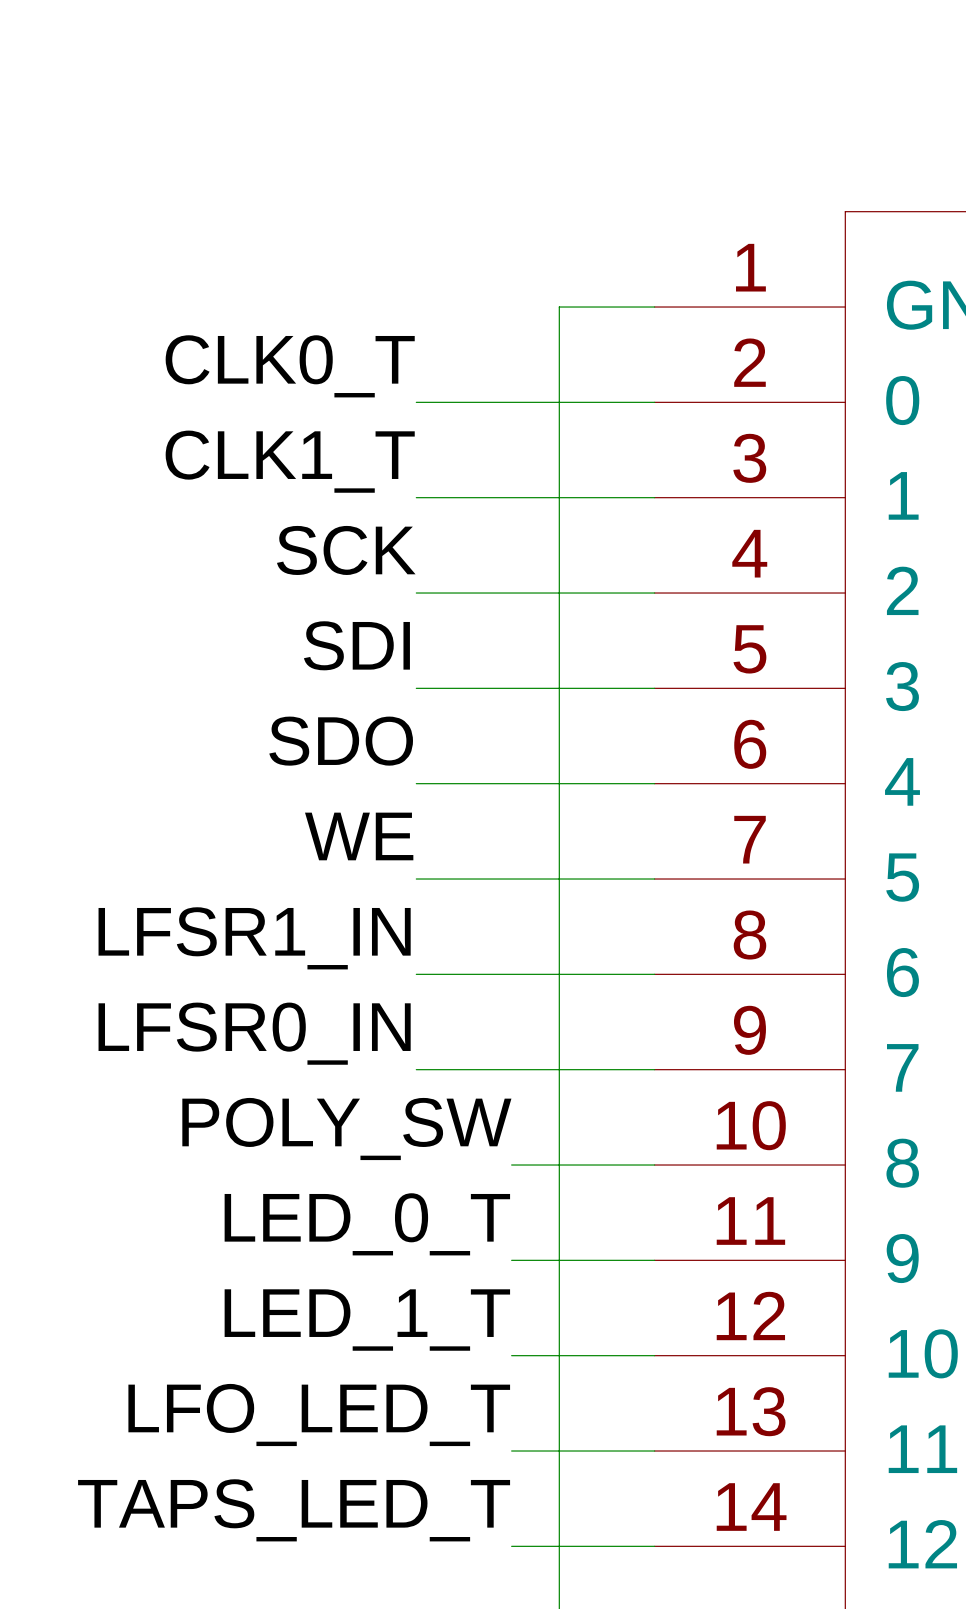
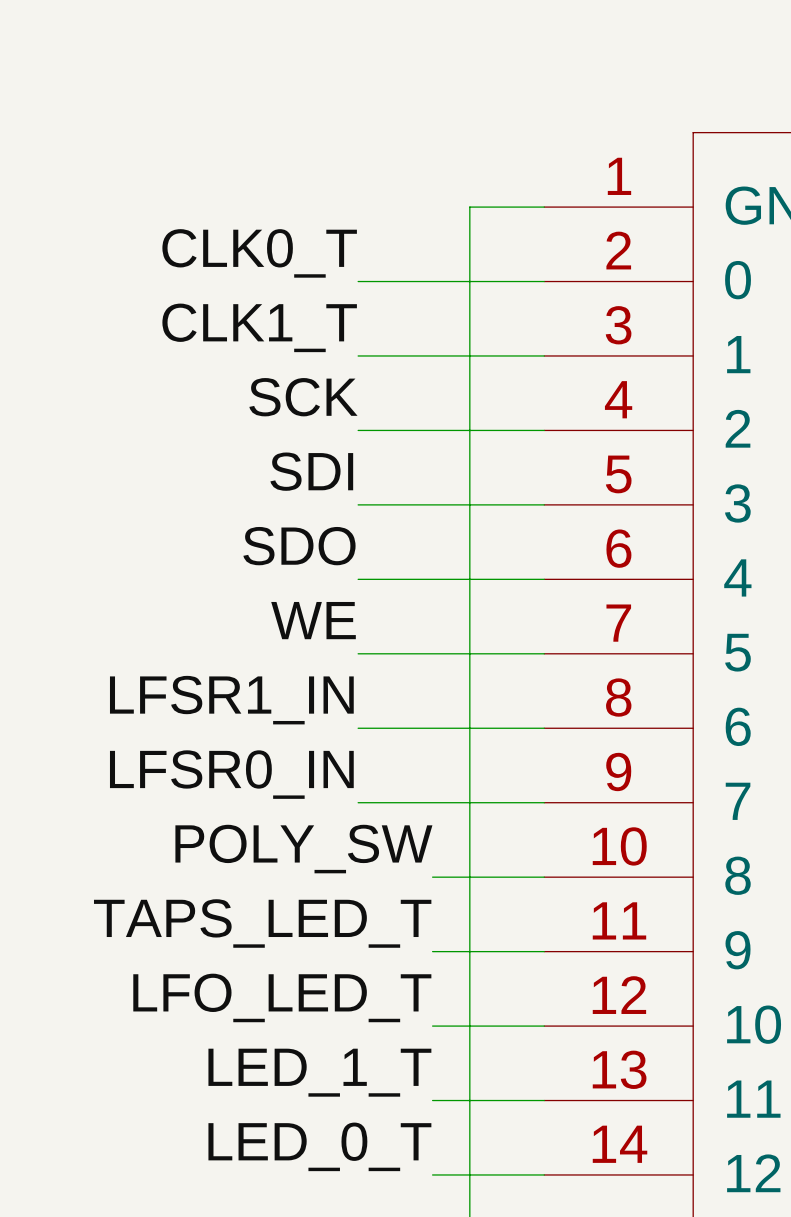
label: LED_0_T (367, 1224) -> TAPS_LED_T (262, 923)
label: LED_1_T (367, 1320) -> LFO_LED_T (282, 997)
label: LFO_LED_T (319, 1414) -> LED_1_T (319, 1072)
label: TAPS_LED_T (294, 1510) -> LED_0_T (319, 1146)

